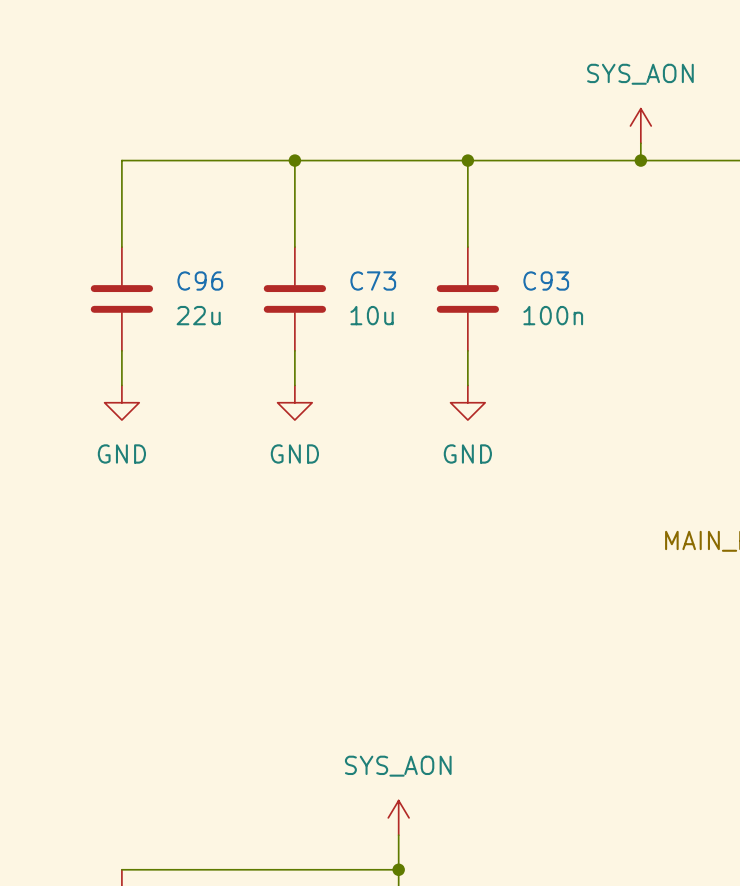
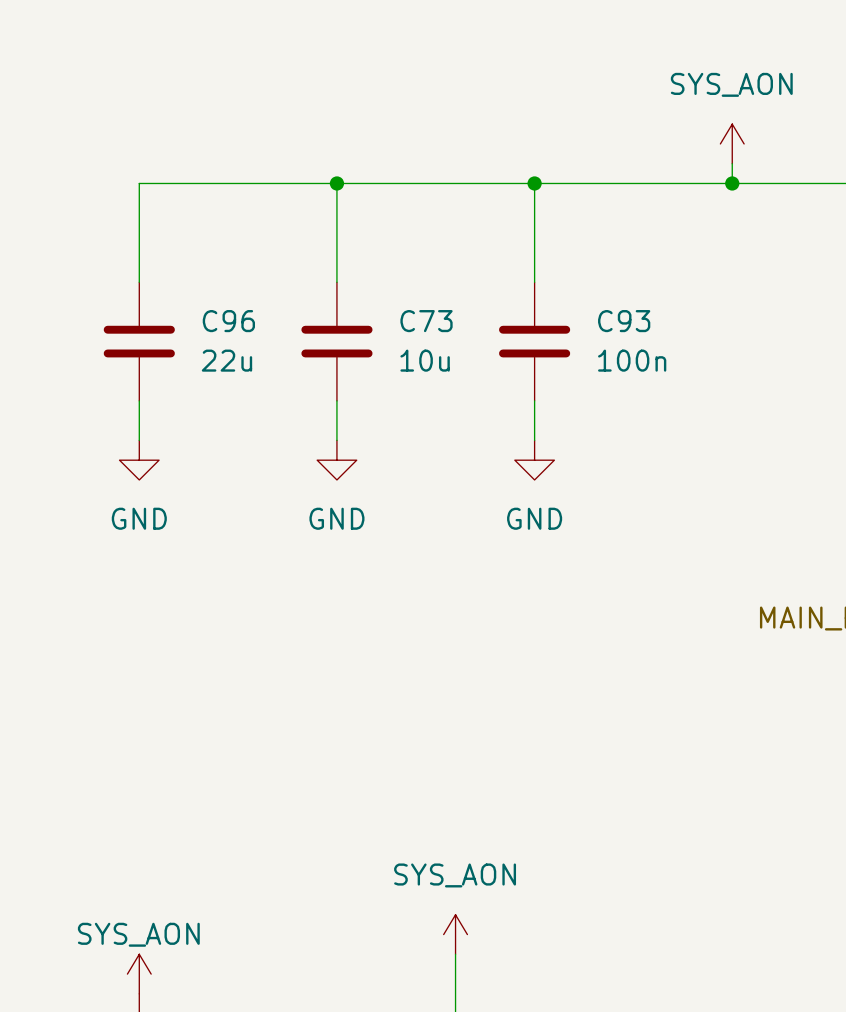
power symbol: none -> SYS_AON (139, 974)
wire: (121, 869) (398, 869) -> none
junction: (398, 869) -> none

